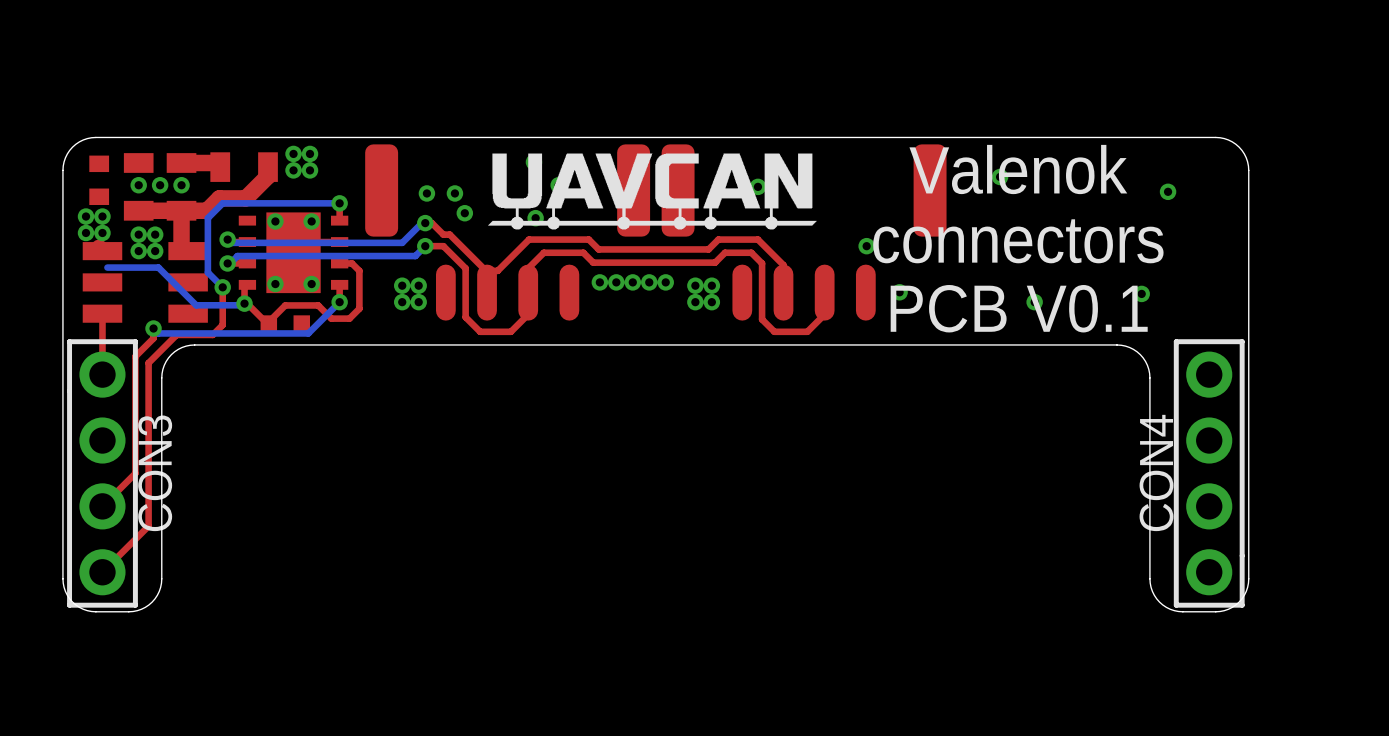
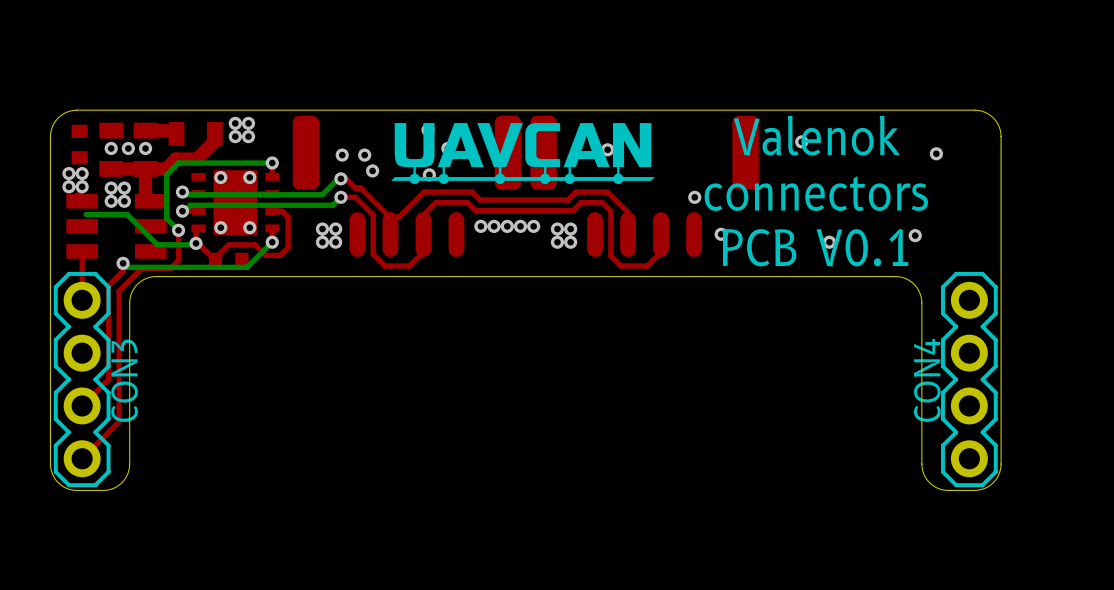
CON3 footprint: [67, 339, 138, 608] -> [53, 271, 111, 488]
CON4 footprint: [1173, 339, 1245, 608] -> [940, 271, 998, 488]

